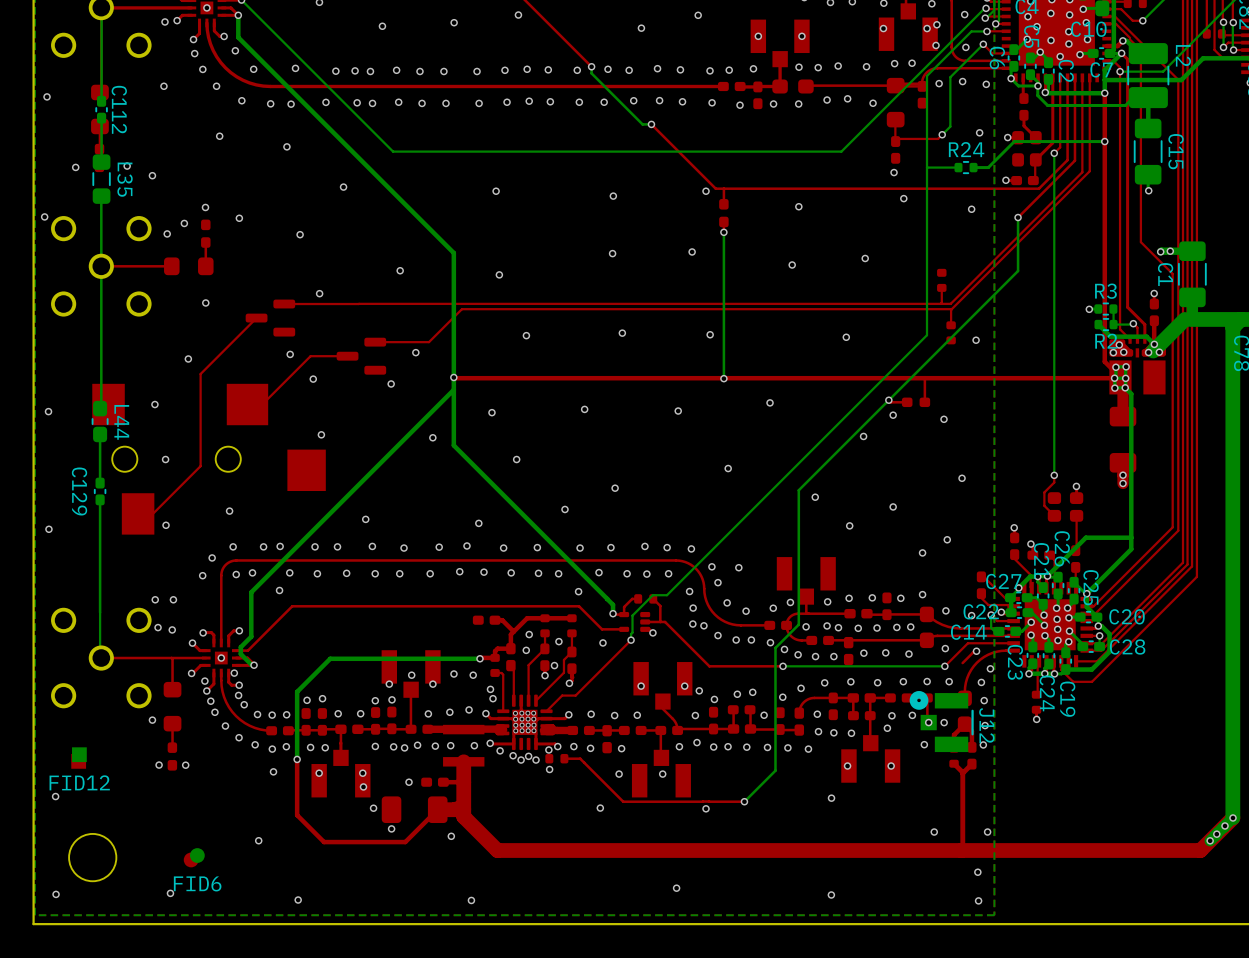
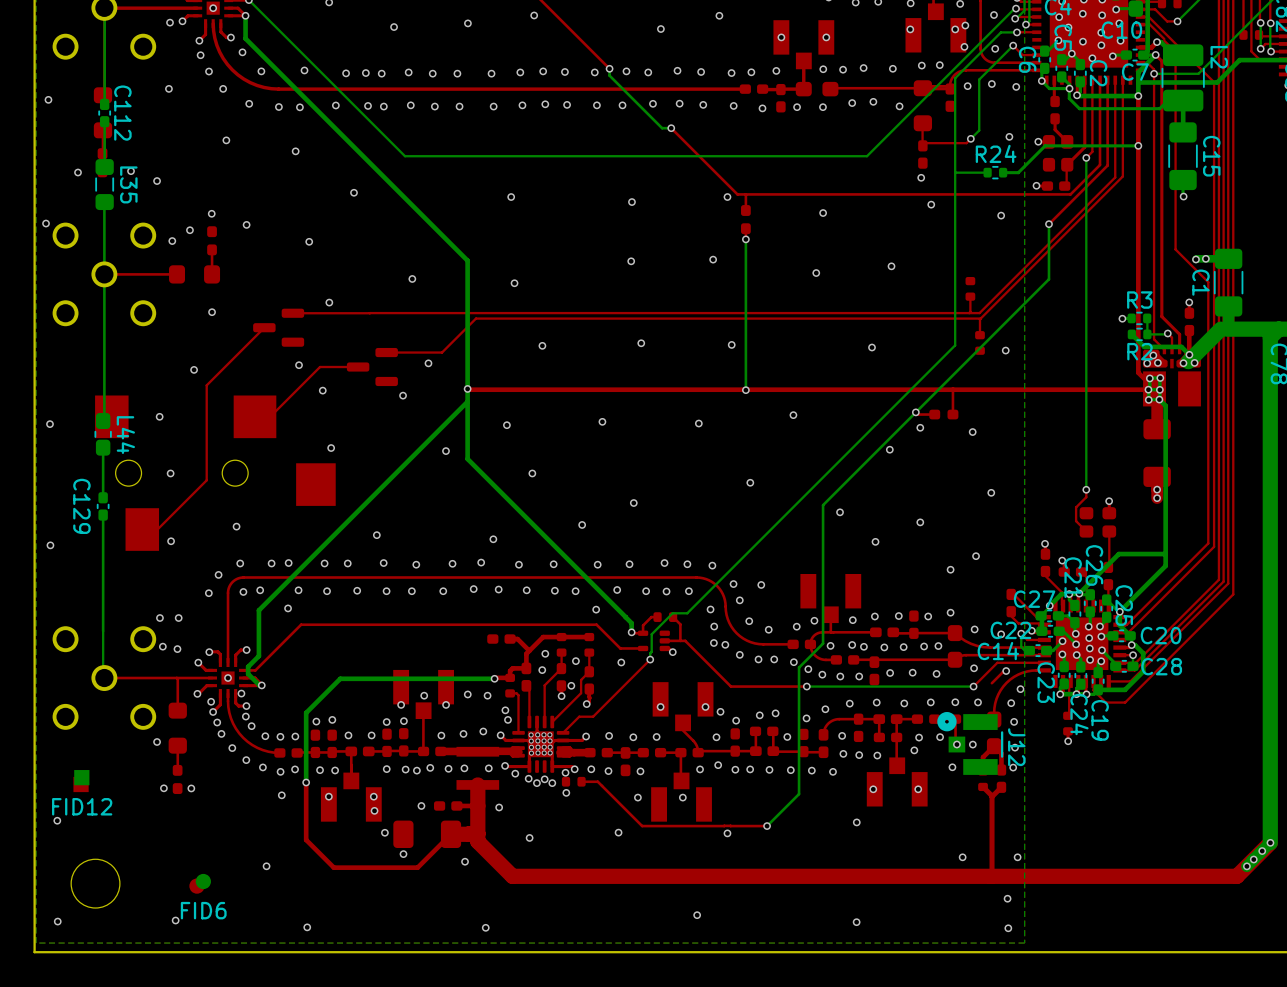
via: none -> (499, 807)
via: none -> (529, 837)

